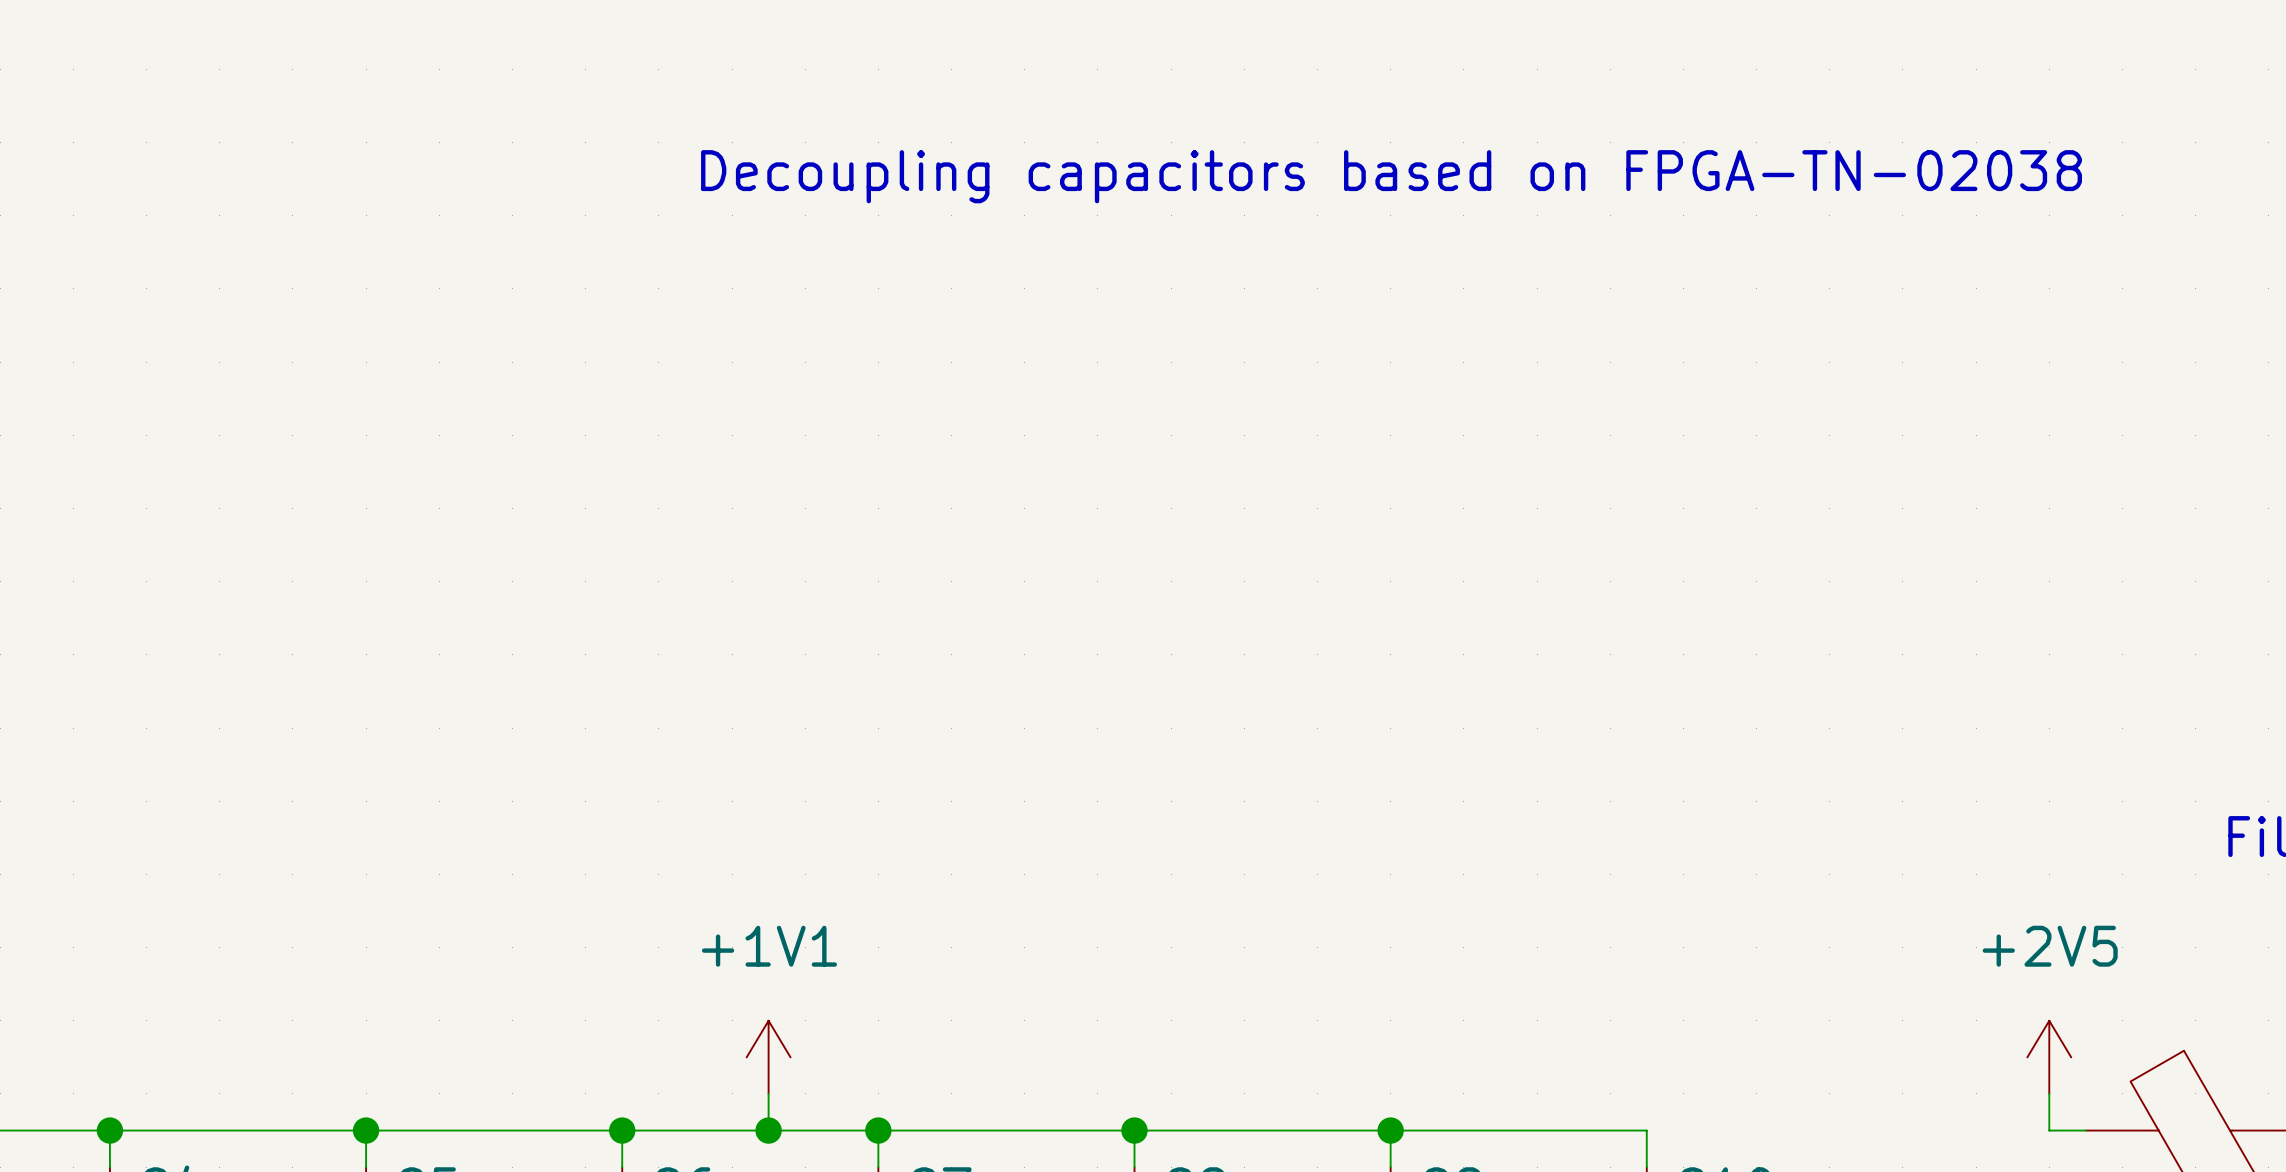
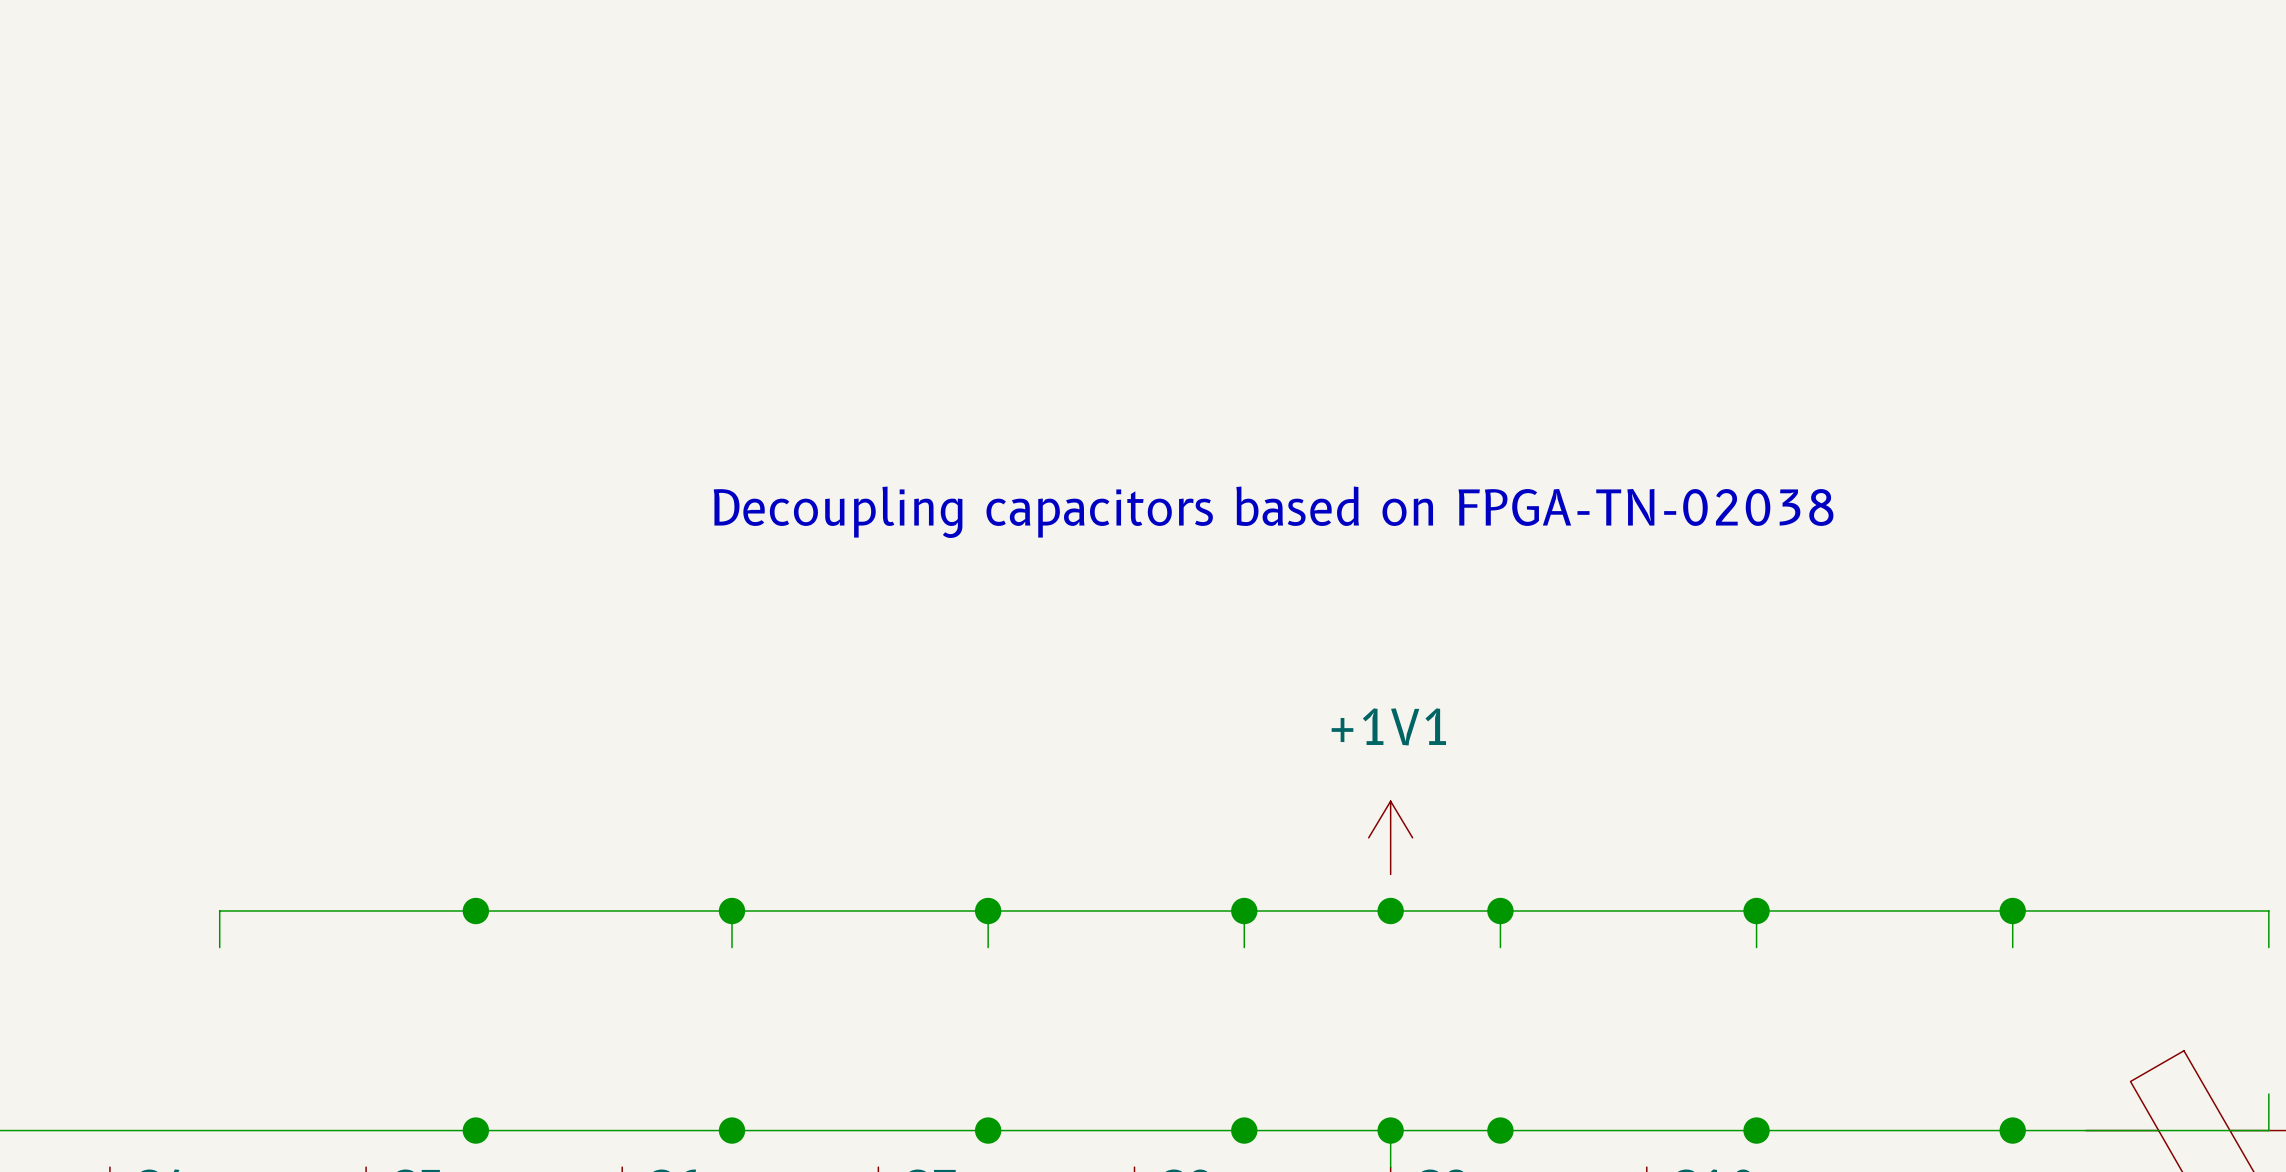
text position: Decoupling capacitors based on FPGA-TN-02038 (1391, 176) -> Decoupling capacitors based on FPGA-TN-02038 (1273, 512)
junction: none -> (475, 911)
junction: none -> (732, 911)
junction: none -> (988, 911)
junction: none -> (1244, 911)
junction: none -> (1390, 911)
junction: none -> (1500, 911)
wire: none -> (1756, 911) (1756, 947)
junction: none -> (1756, 911)
junction: none -> (2012, 911)
wire: none -> (219, 947) (219, 911) (2268, 911) (2268, 947)
power symbol position: +1V1 (768, 1057) -> +1V1 (1390, 837)
power symbol: +2V5 (2049, 1057) -> none
wire: (768, 1093) (768, 1130) -> none
wire: (2049, 1093) (2049, 1130) -> (1646, 1130) (2049, 1130)
wire: none -> (2268, 1093) (2268, 1130) (2085, 1130)
wire: (109, 1130) (109, 1167) -> none
junction: (109, 1130) -> none
wire: (366, 1130) (366, 1167) -> (732, 911) (732, 947)
junction: (366, 1130) -> none
junction: none -> (475, 1130)
wire: (622, 1130) (622, 1167) -> (988, 911) (988, 947)
junction: (622, 1130) -> none
junction position: (768, 1130) -> (732, 1130)
wire: (878, 1130) (878, 1167) -> (1244, 911) (1244, 947)
junction: (878, 1130) -> none
junction: none -> (988, 1130)
wire: (1134, 1130) (1134, 1167) -> (1500, 911) (1500, 947)
junction: (1134, 1130) -> none
junction: none -> (1244, 1130)
junction: none -> (1500, 1130)
wire: (1646, 1130) (1646, 1167) -> (2012, 911) (2012, 947)
junction: none -> (1756, 1130)
junction: none -> (2012, 1130)

